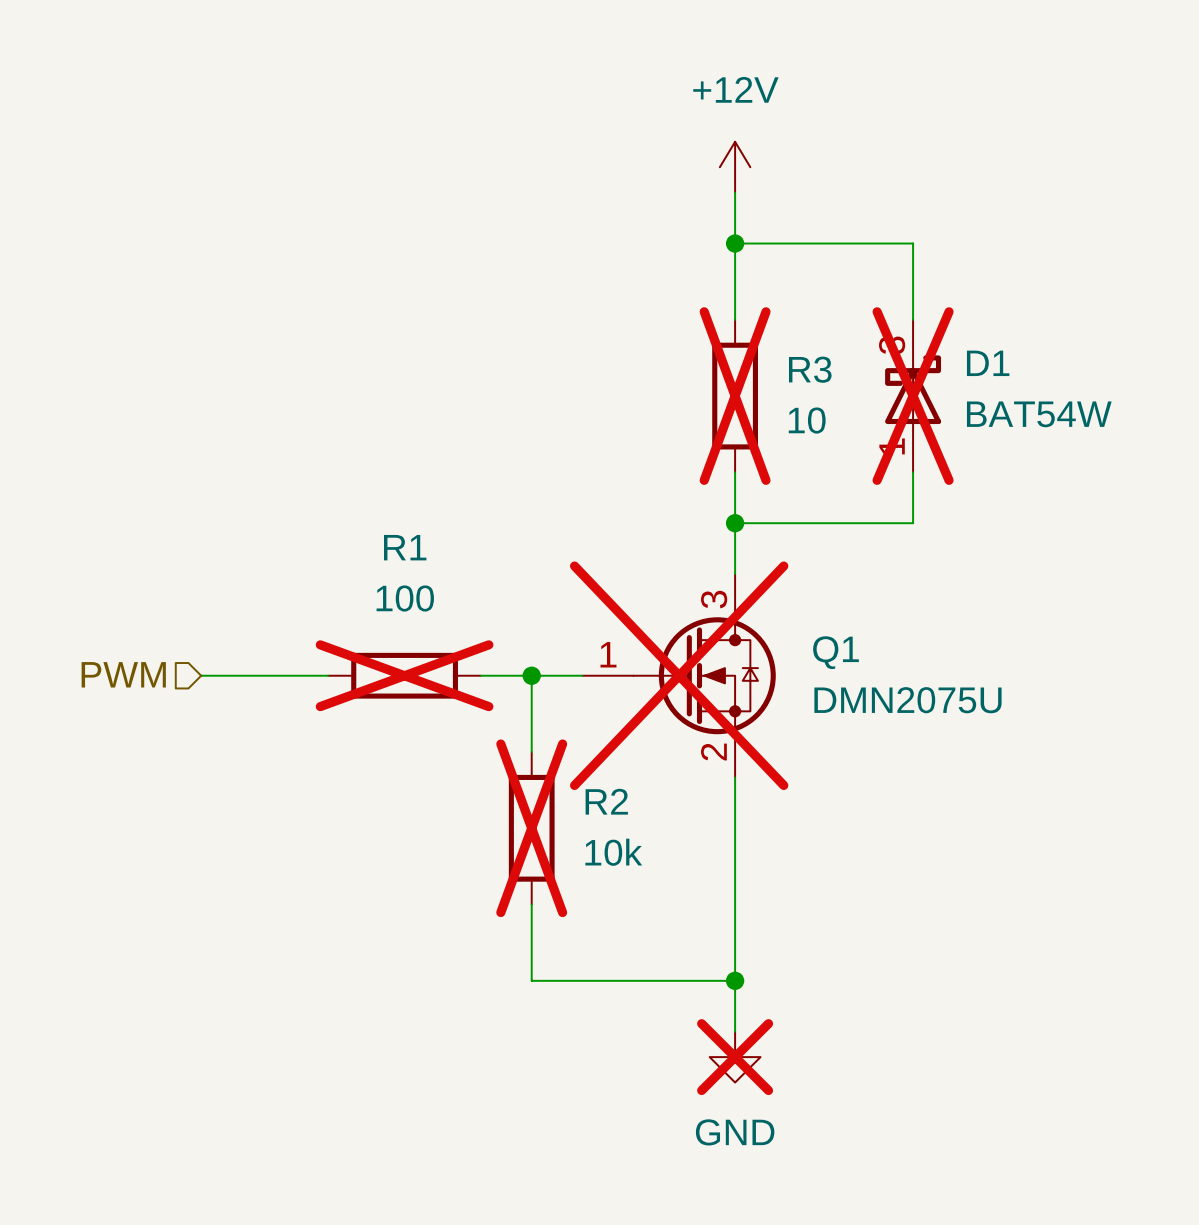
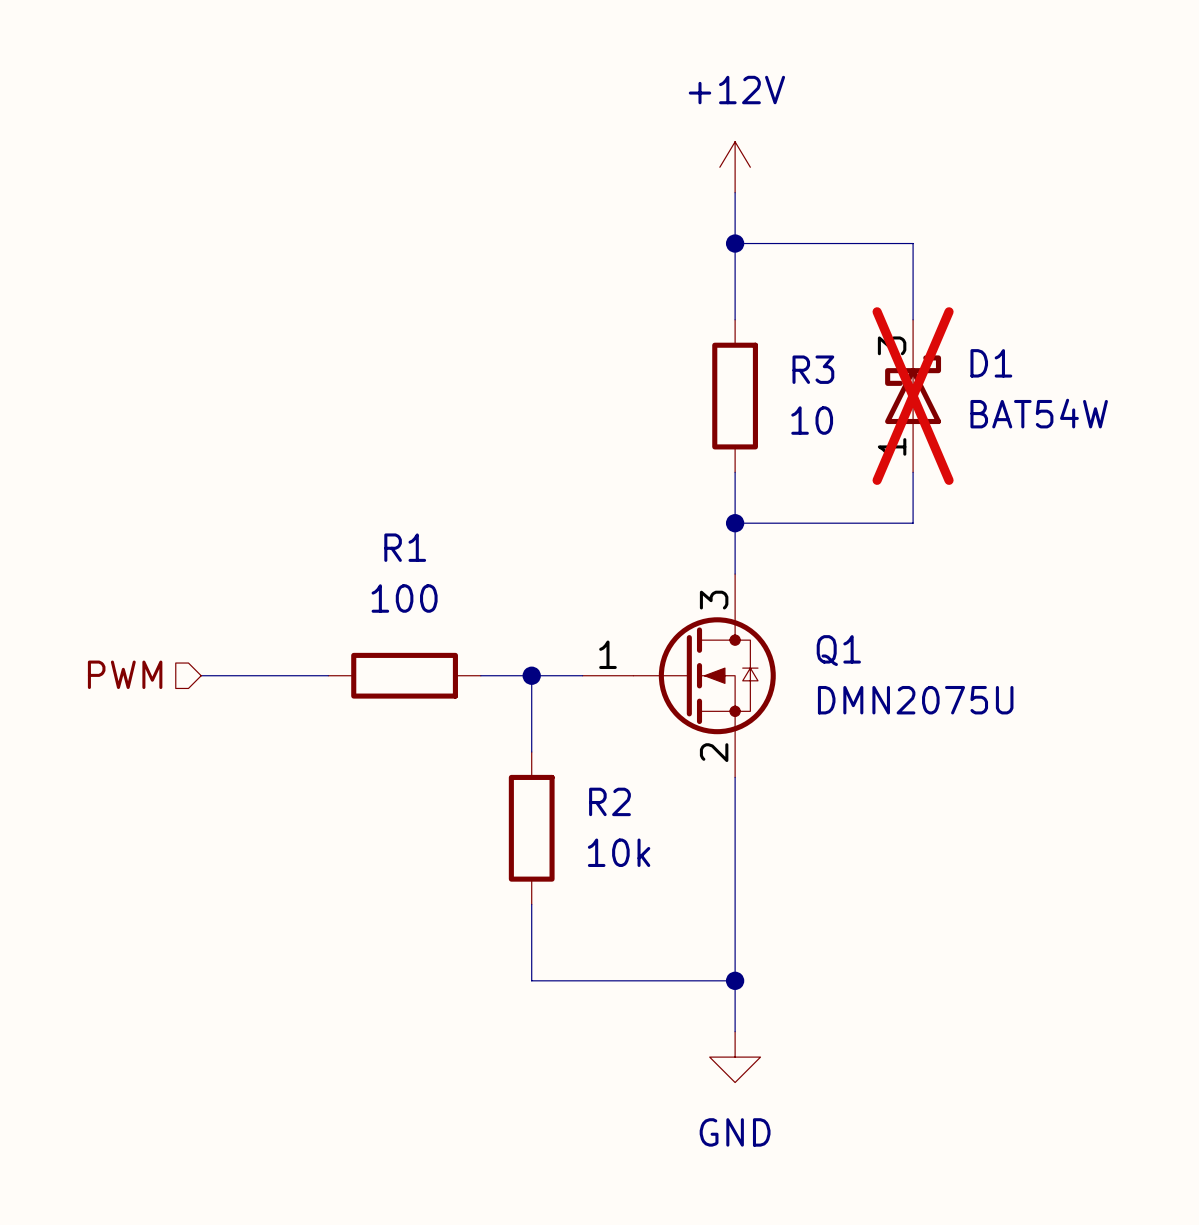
R3 do-not-place cross: (735, 396) -> none
R1 do-not-place cross: (404, 675) -> none
Q1 do-not-place cross: (679, 675) -> none
R2 do-not-place cross: (531, 828) -> none
power symbol do-not-place cross: (735, 1057) -> none

